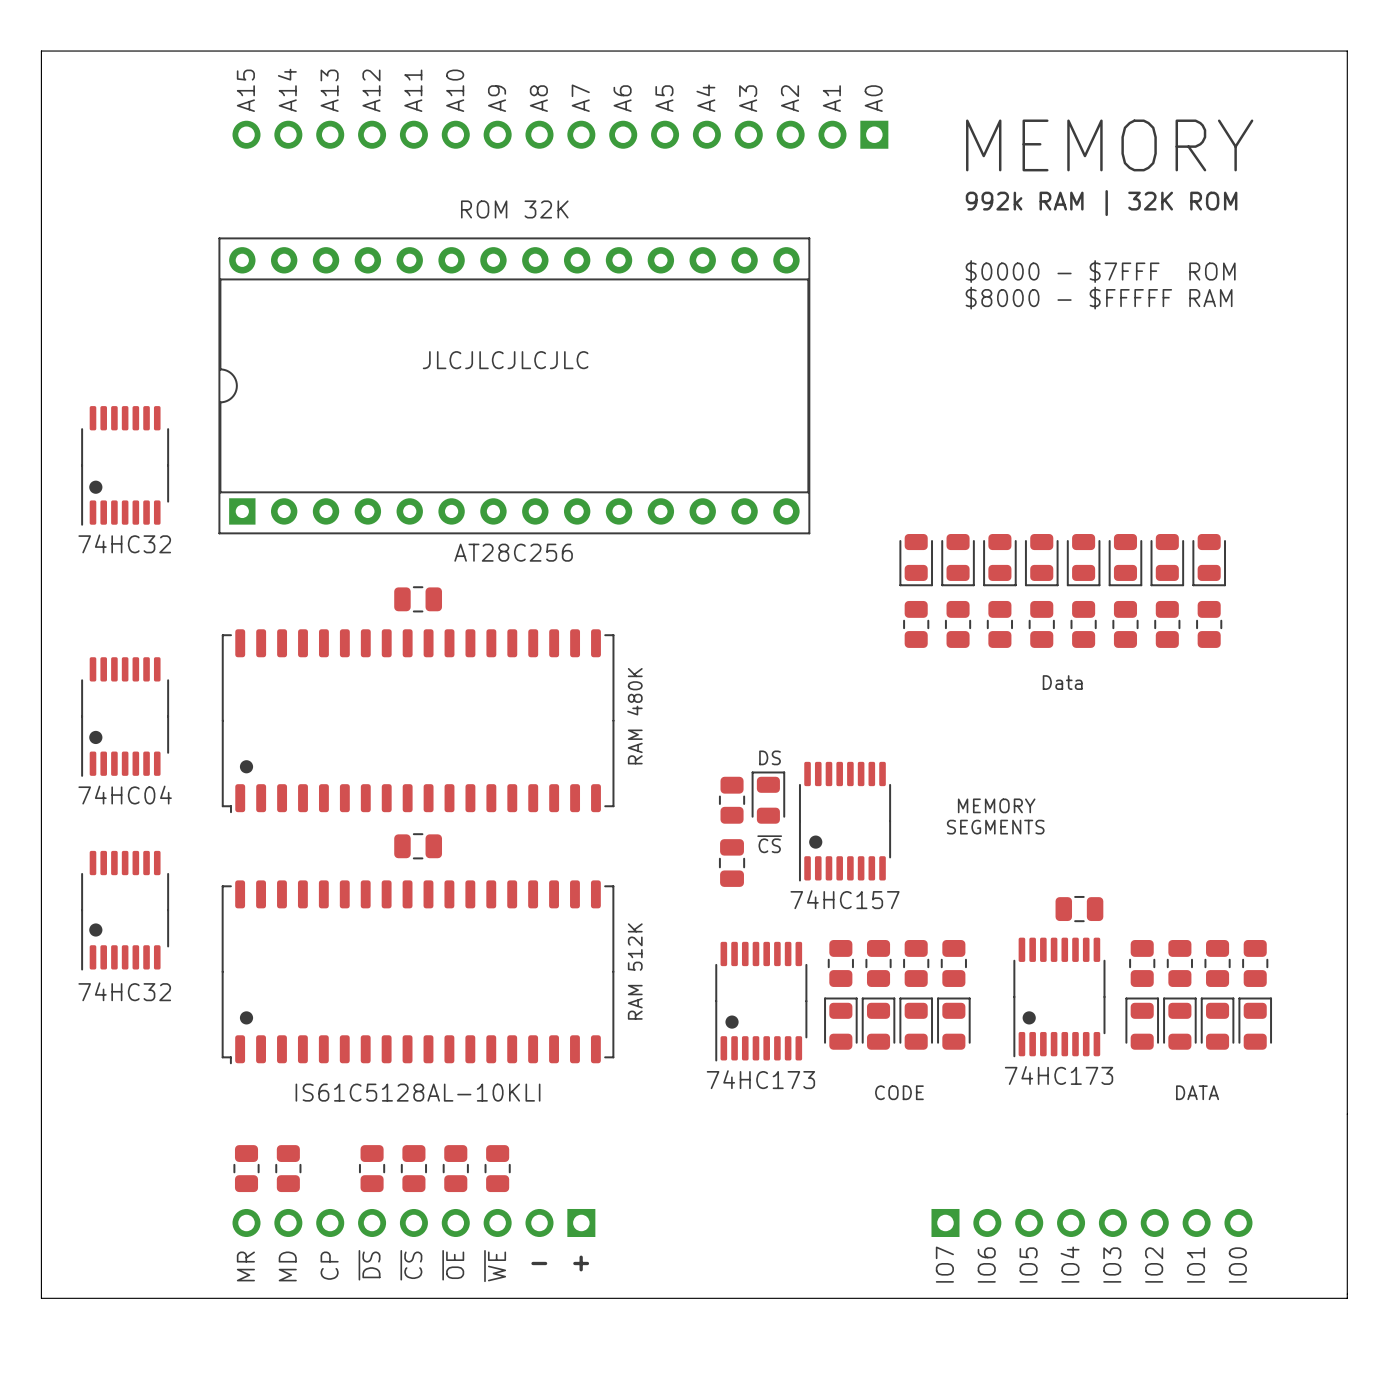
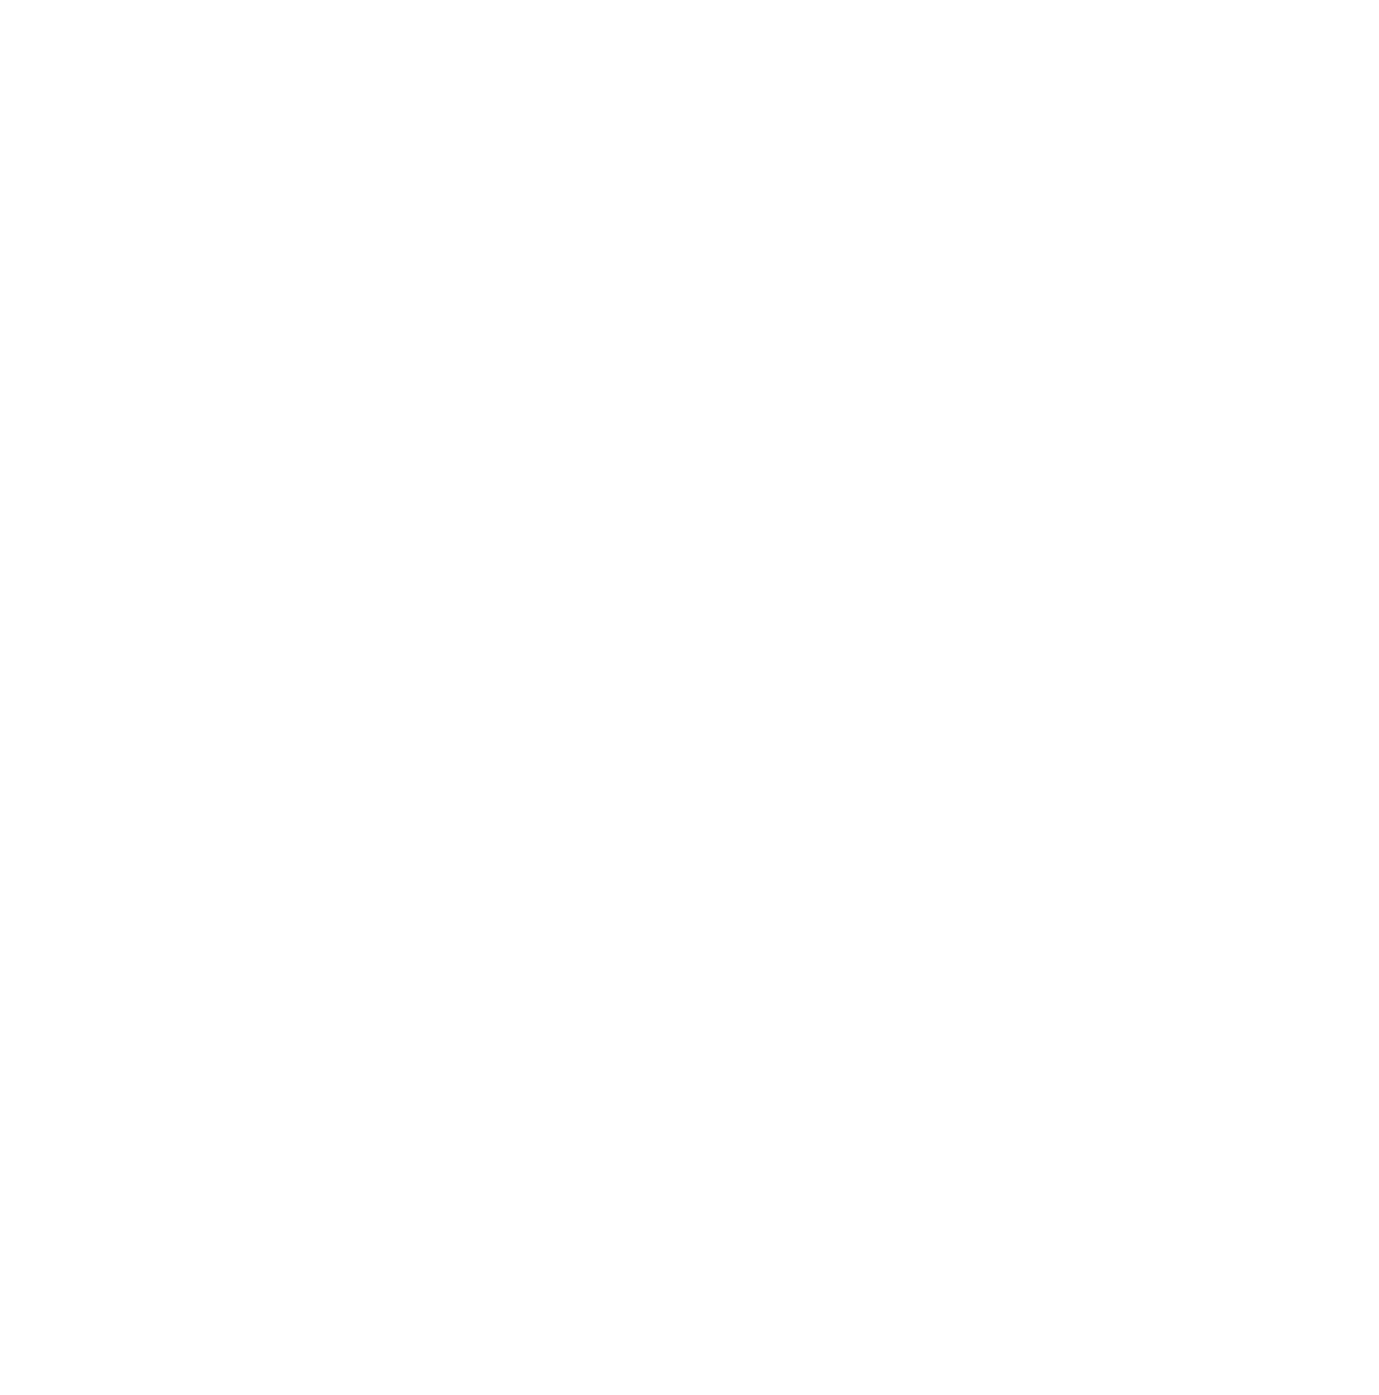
board edge: (41, 51) (1347, 51) (1347, 1298) (41, 1298) (41, 51) -> none
text: A15 (245, 90) -> none
text: A14 (287, 90) -> none
text: A13 (329, 90) -> none
text: A12 (371, 90) -> none
text: A11 (413, 90) -> none
text: A10 (455, 90) -> none
text: A9 (497, 98) -> none
text: A8 (538, 98) -> none
text: A7 (580, 98) -> none
text: A6 (622, 98) -> none
text: A5 (664, 98) -> none
text: A4 (705, 98) -> none
text: A3 (748, 98) -> none
text: A2 (790, 98) -> none
text: A1 (831, 98) -> none
text: A0 (873, 98) -> none
part: (560, 134) -> none
text: MEMORY (1109, 145) -> none
text: 992k RAM | 32K ROM (1101, 203) -> none
text: ROM 32K (514, 209) -> none
text: $0000 - $7FFF ROM (1100, 271) -> none
text: $8000 - $FFFFF RAM (1099, 298) -> none
text: JLCJLCJLCJLC (505, 360) -> none
part: (514, 385) -> none
part: (125, 465) -> none
drawing: [89, 480, 103, 494] -> none
part: (916, 560) -> none
part: (958, 560) -> none
part: (999, 560) -> none
part: (1041, 560) -> none
part: (1083, 560) -> none
part: (1125, 560) -> none
part: (1167, 560) -> none
part: (1209, 560) -> none
part: (418, 599) -> none
part: (916, 624) -> none
part: (958, 624) -> none
part: (999, 624) -> none
part: (1041, 624) -> none
part: (1083, 624) -> none
part: (1125, 624) -> none
part: (1167, 624) -> none
part: (1209, 624) -> none
text: Data (1062, 682) -> none
text: RAM 480K (634, 716) -> none
part: (125, 717) -> none
part: (418, 721) -> none
drawing: [89, 730, 103, 745] -> none
text: DS (770, 757) -> none
drawing: [239, 760, 254, 774] -> none
part: (768, 797) -> none
part: (732, 800) -> none
text: MEMORY (996, 805) -> none
part: (845, 821) -> none
text: SEGMENTS (995, 827) -> none
drawing: [809, 835, 823, 849] -> none
text: ~{CS} (769, 844) -> none
part: (418, 846) -> none
part: (732, 863) -> none
part: (1079, 909) -> none
part: (125, 910) -> none
drawing: [89, 923, 103, 937] -> none
part: (840, 963) -> none
part: (878, 963) -> none
part: (916, 963) -> none
part: (953, 963) -> none
part: (1142, 963) -> none
part: (1179, 963) -> none
part: (1217, 963) -> none
part: (1255, 963) -> none
text: RAM 512K (635, 971) -> none
part: (418, 972) -> none
part: (1059, 997) -> none
part: (761, 1001) -> none
drawing: [239, 1011, 254, 1025] -> none
drawing: [1022, 1011, 1036, 1025] -> none
drawing: [725, 1015, 739, 1029] -> none
part: (840, 1023) -> none
part: (878, 1023) -> none
part: (916, 1023) -> none
part: (953, 1023) -> none
part: (1142, 1023) -> none
part: (1179, 1023) -> none
part: (1217, 1023) -> none
part: (1255, 1023) -> none
text: CODE (899, 1092) -> none
text: DATA (1197, 1092) -> none
part: (246, 1168) -> none
part: (288, 1168) -> none
part: (372, 1168) -> none
part: (413, 1168) -> none
part: (455, 1168) -> none
part: (497, 1168) -> none
part: (413, 1222) -> none
part: (1091, 1222) -> none
text: - (539, 1263) -> none
text: + (581, 1263) -> none
text: IO7 (944, 1264) -> none
text: IO4 (1070, 1264) -> none
text: CP (329, 1265) -> none
text: ~{DS} (369, 1265) -> none
text: ~{CS} (411, 1265) -> none
text: ~{OE} (453, 1265) -> none
text: IO6 (986, 1265) -> none
text: IO5 (1028, 1265) -> none
text: IO3 (1112, 1265) -> none
text: IO2 (1154, 1265) -> none
text: IO1 (1196, 1265) -> none
text: IO0 (1237, 1265) -> none
text: MR (245, 1266) -> none
text: MD (287, 1266) -> none
text: ~{WE} (495, 1266) -> none

